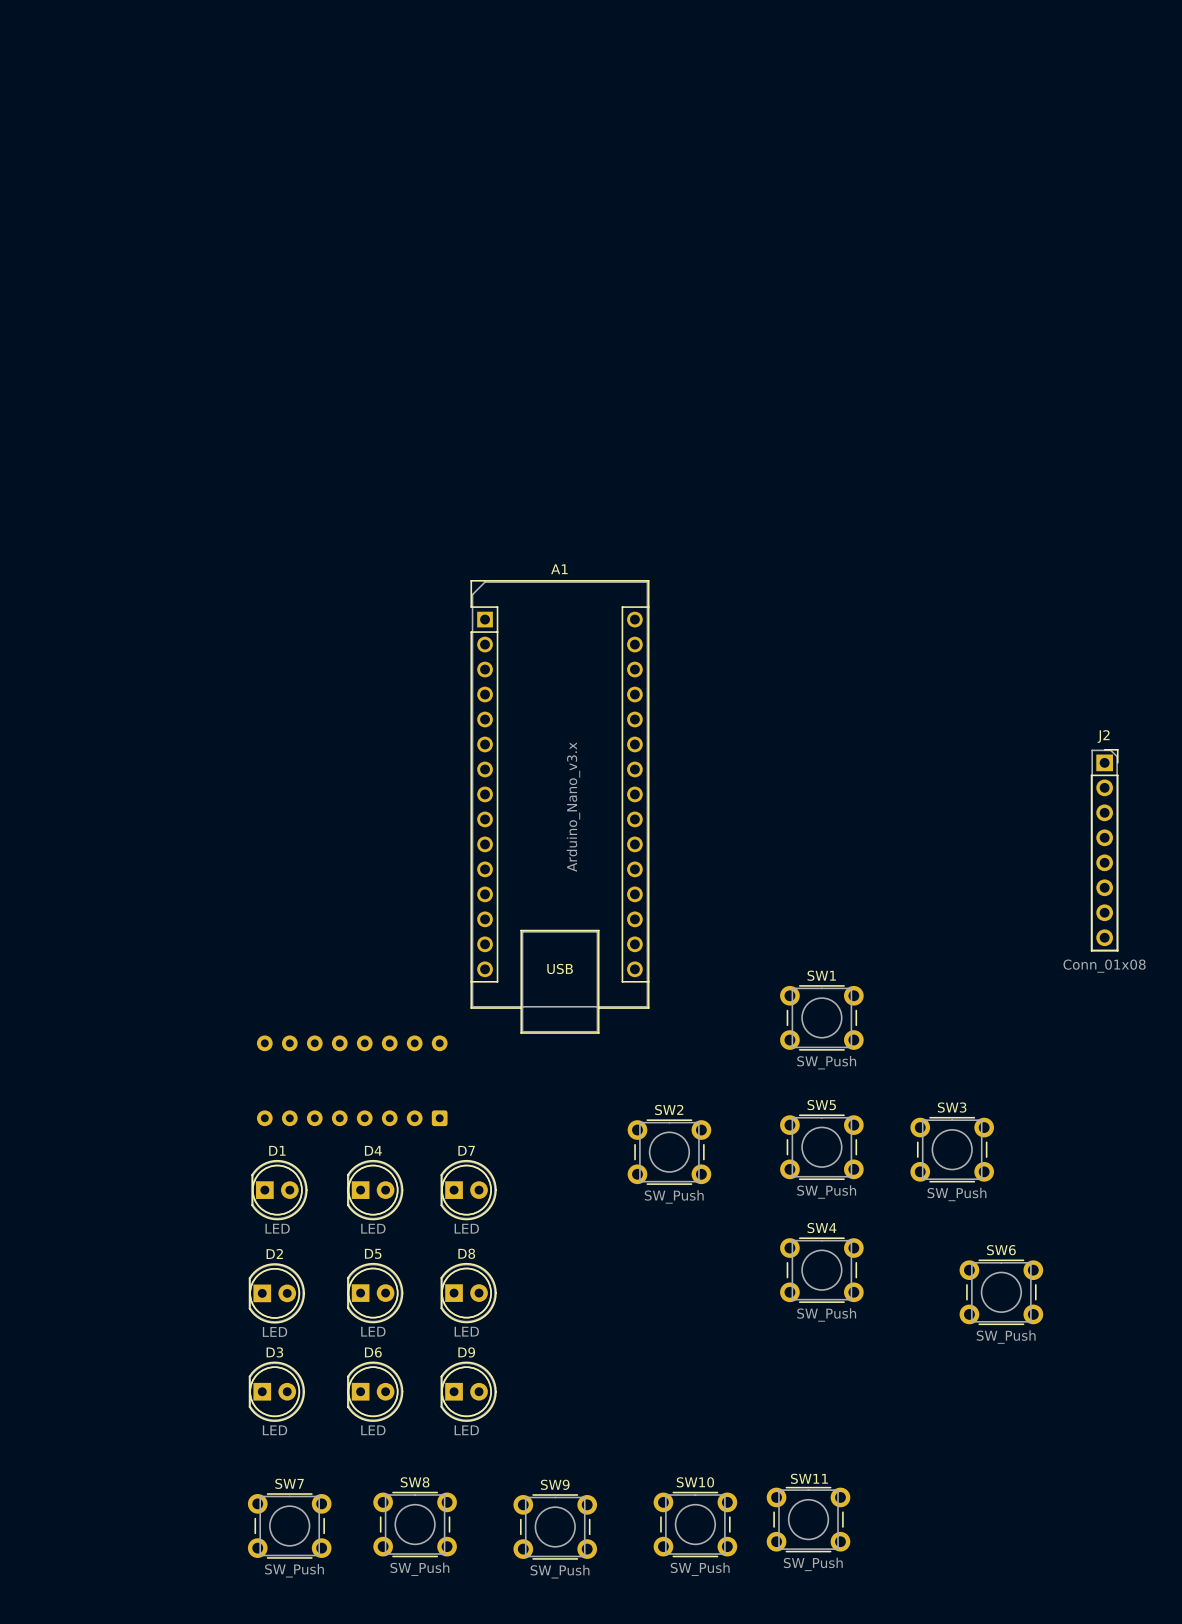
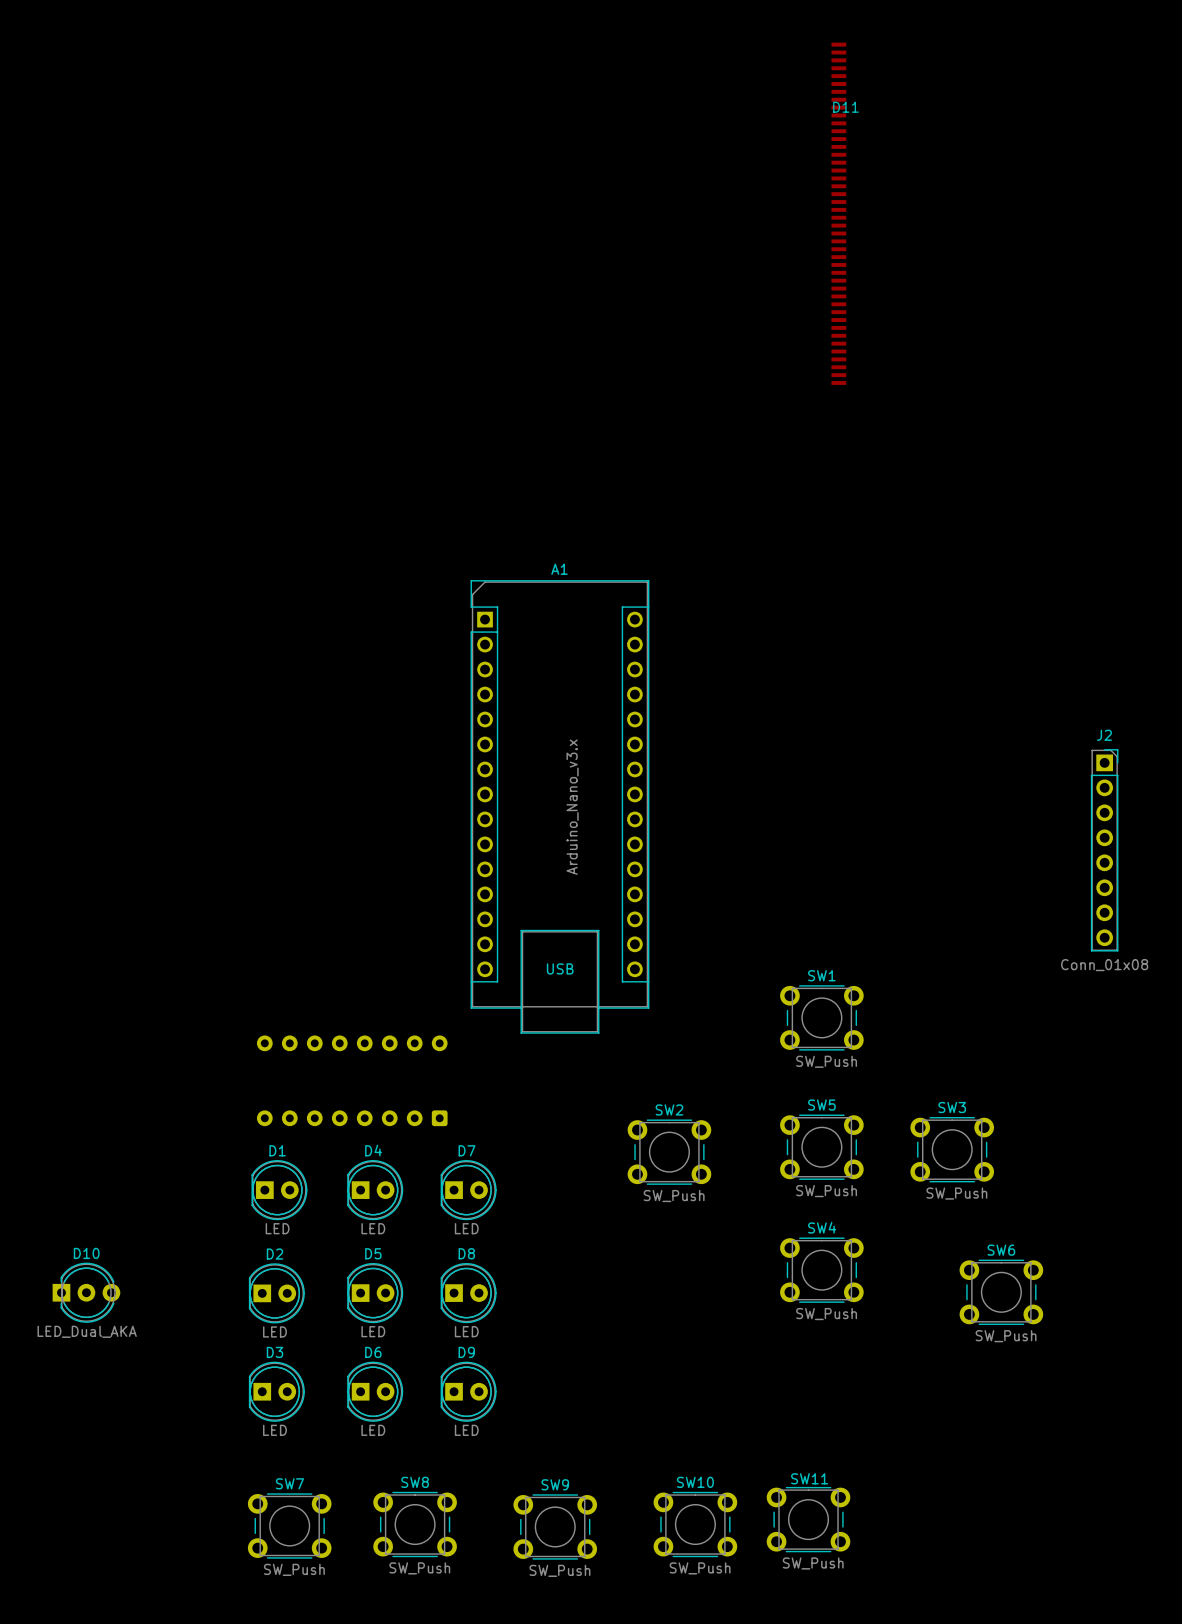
D11: none -> (838, 213)
D10: none -> LED_Dual_AKA (86, 1292)

